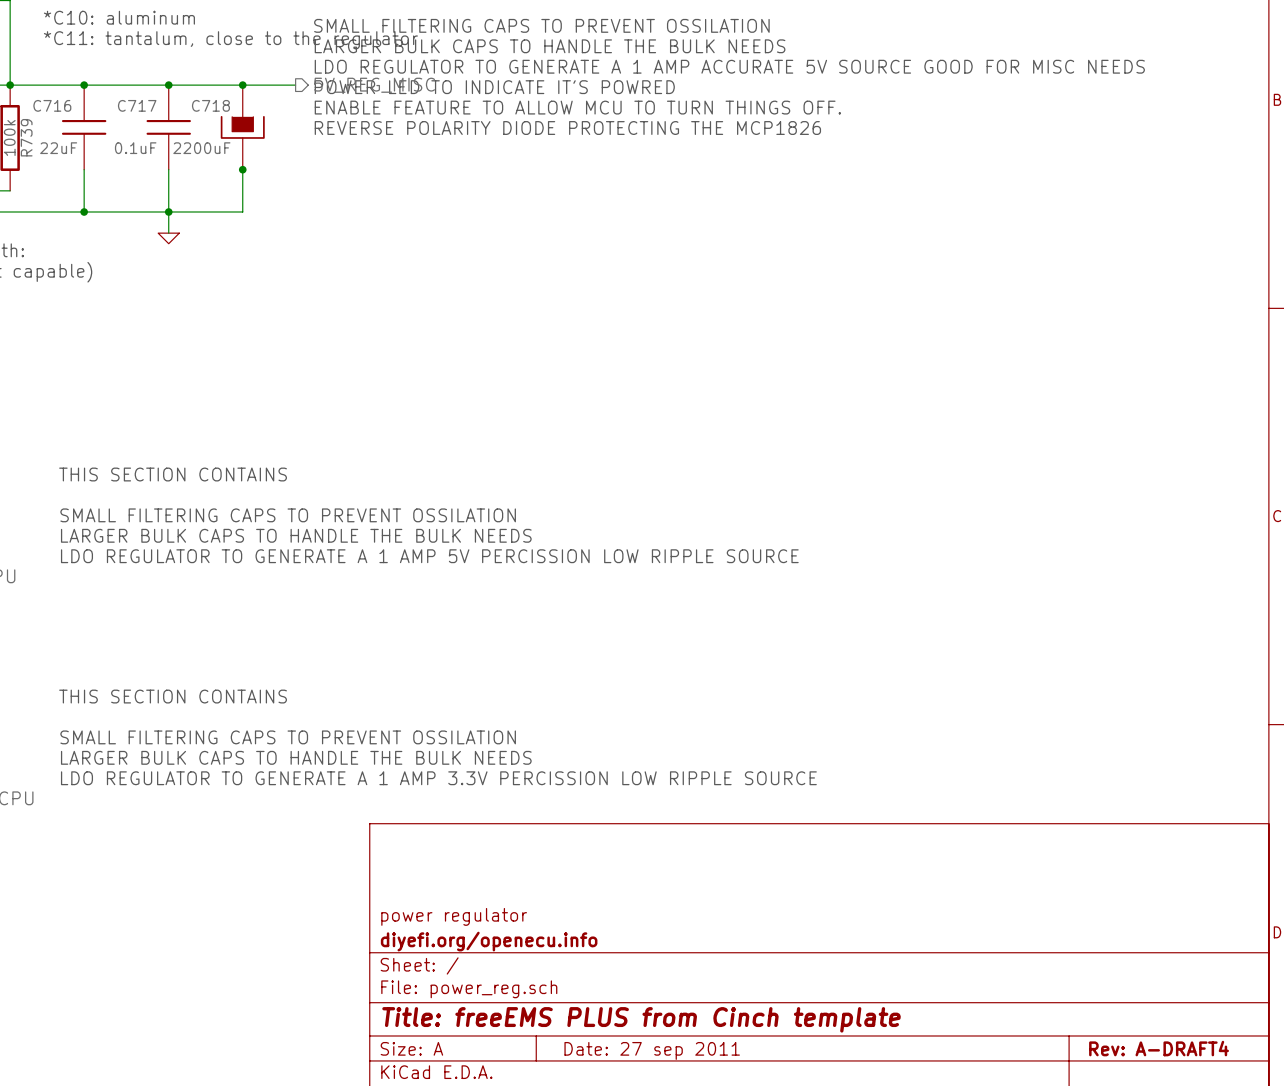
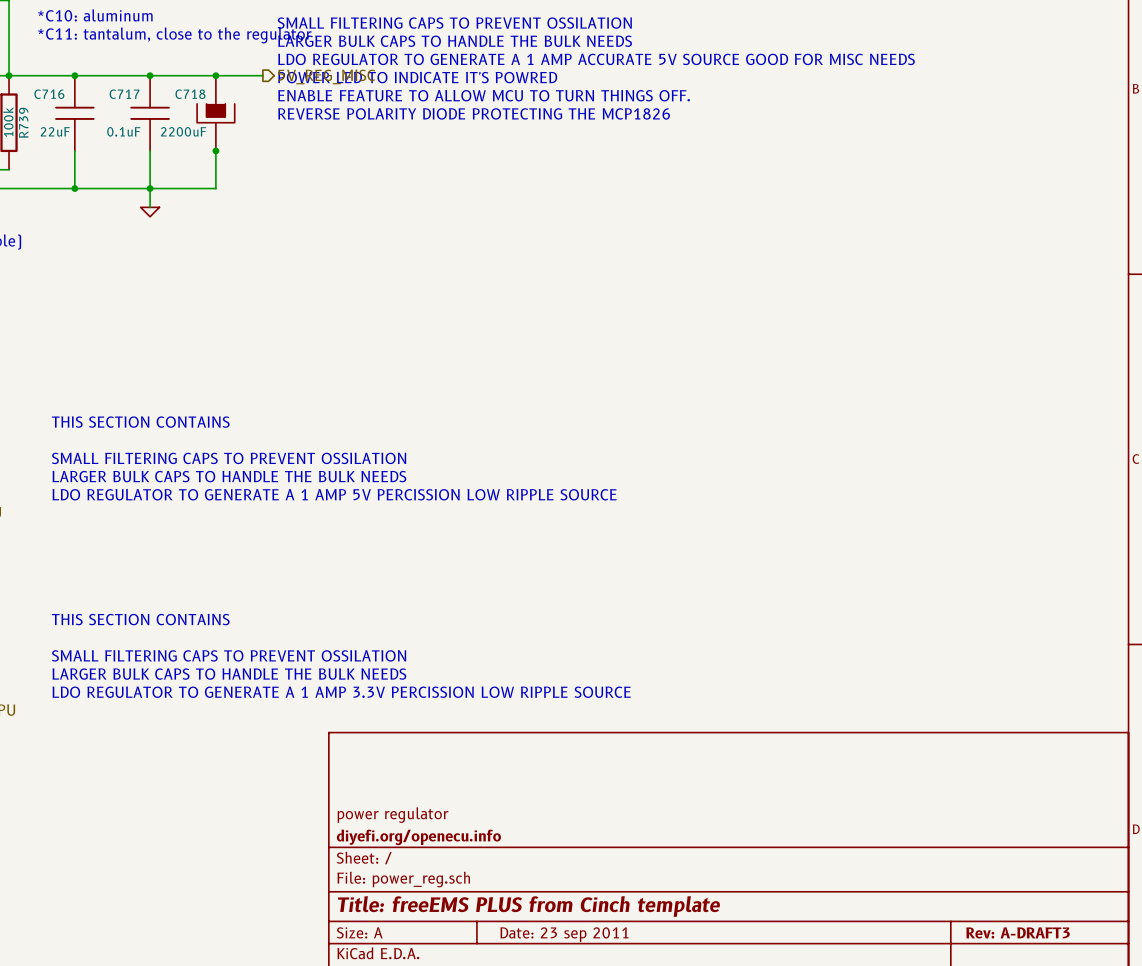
title block: Rev: A-DRAFT4 (1159, 1048) -> Rev: A-DRAFT3 (1018, 932)
title block: Date: 27 sep 2011 (652, 1050) -> Date: 23 sep 2011 (564, 934)

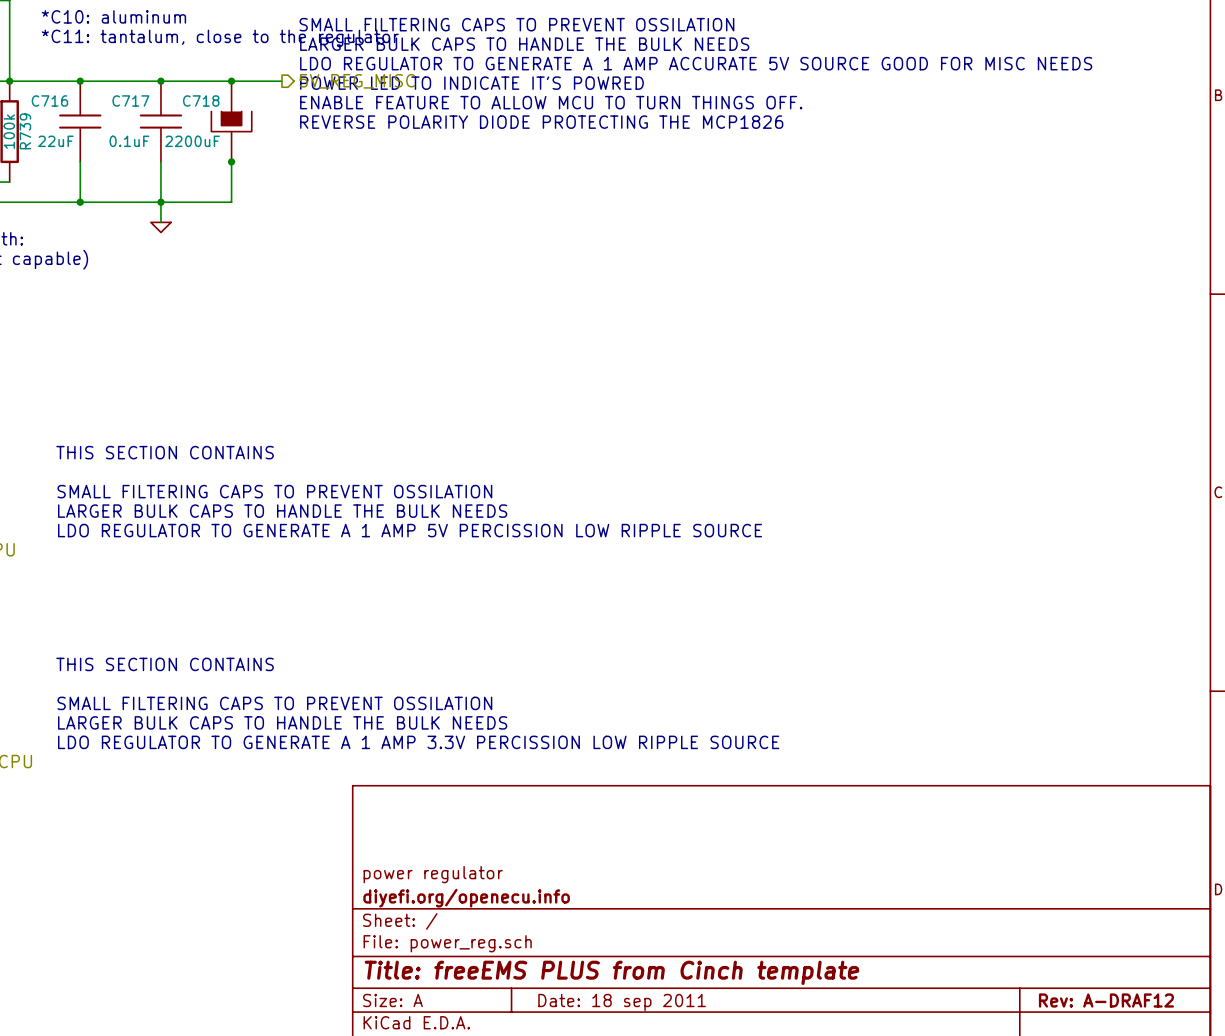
title block: Rev: A-DRAFT3 (1018, 932) -> Rev: A-DRAF12 (1106, 1000)
title block: Date: 23 sep 2011 (564, 934) -> Date: 18 sep 2011 (622, 1002)

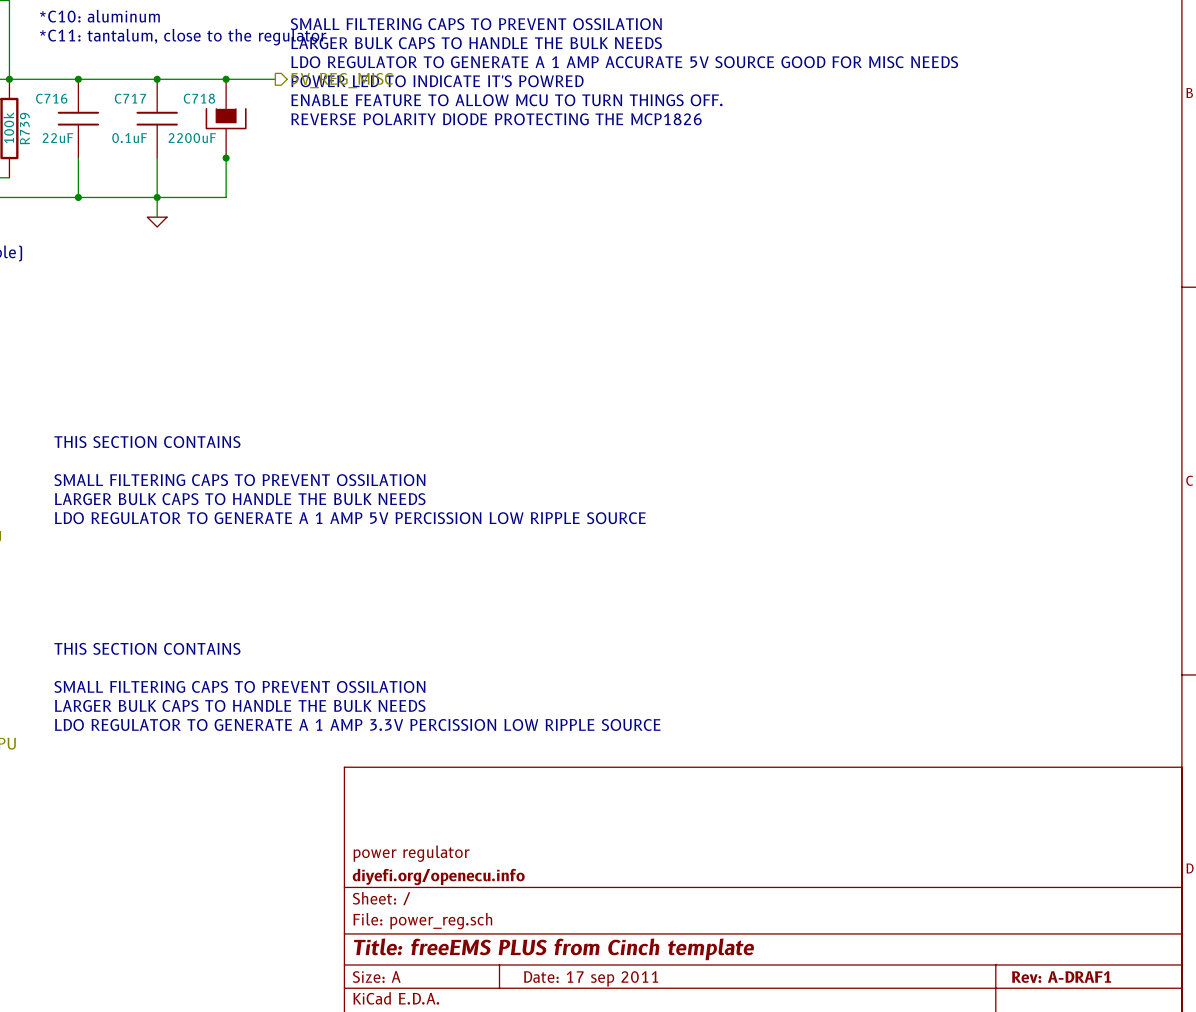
title block: Rev: A-DRAF12 (1106, 1000) -> Rev: A-DRAF1 (1061, 977)
title block: Date: 18 sep 2011 (622, 1002) -> Date: 17 sep 2011 (591, 978)

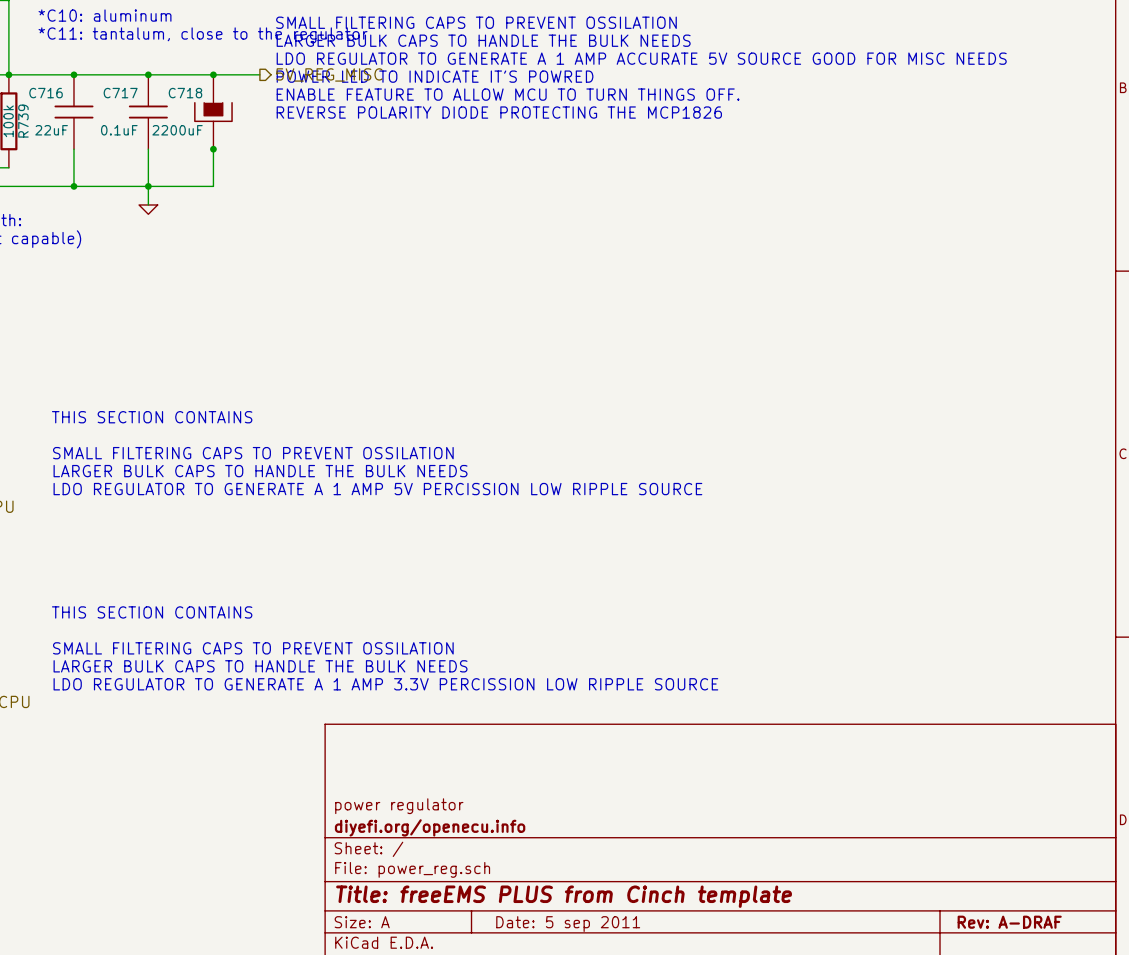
title block: Rev: A-DRAF1 (1061, 977) -> Rev: A-DRAF (1009, 922)
title block: Date: 17 sep 2011 (591, 978) -> Date: 5 sep 2011 (568, 924)

